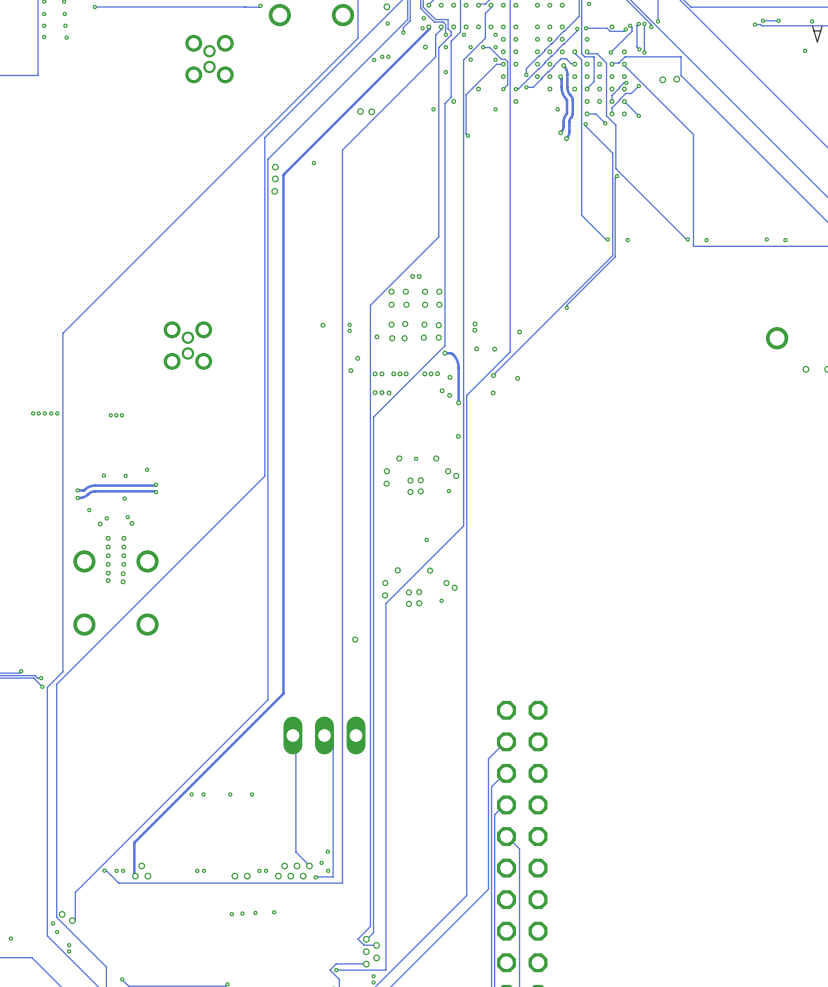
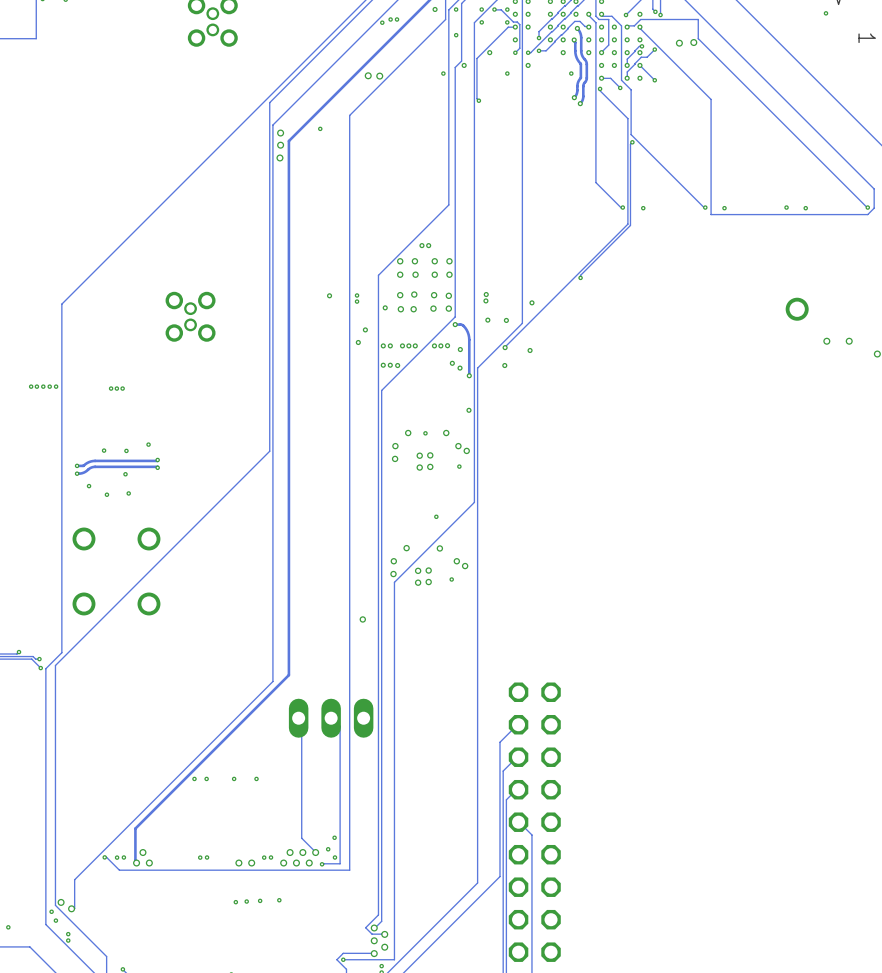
via: (131, 523) -> none
via: (100, 524) -> none
via: (108, 538) -> none
via: (123, 538) -> none
via: (108, 547) -> none
via: (123, 547) -> none
via: (108, 555) -> none
via: (123, 555) -> none
via: (108, 564) -> none
via: (123, 564) -> none
via: (108, 573) -> none
via: (123, 573) -> none
via: (108, 580) -> none
via: (123, 581) -> none

